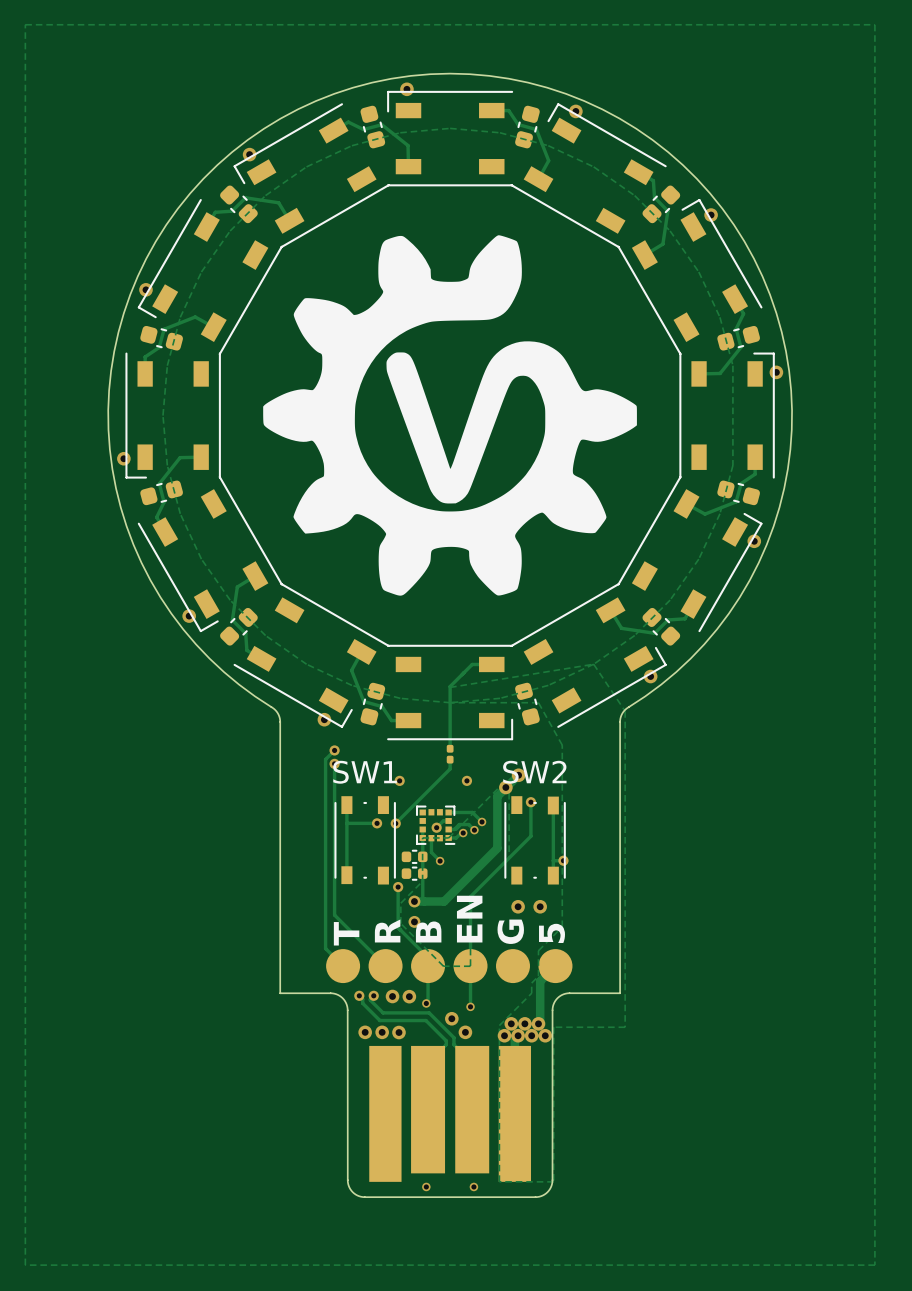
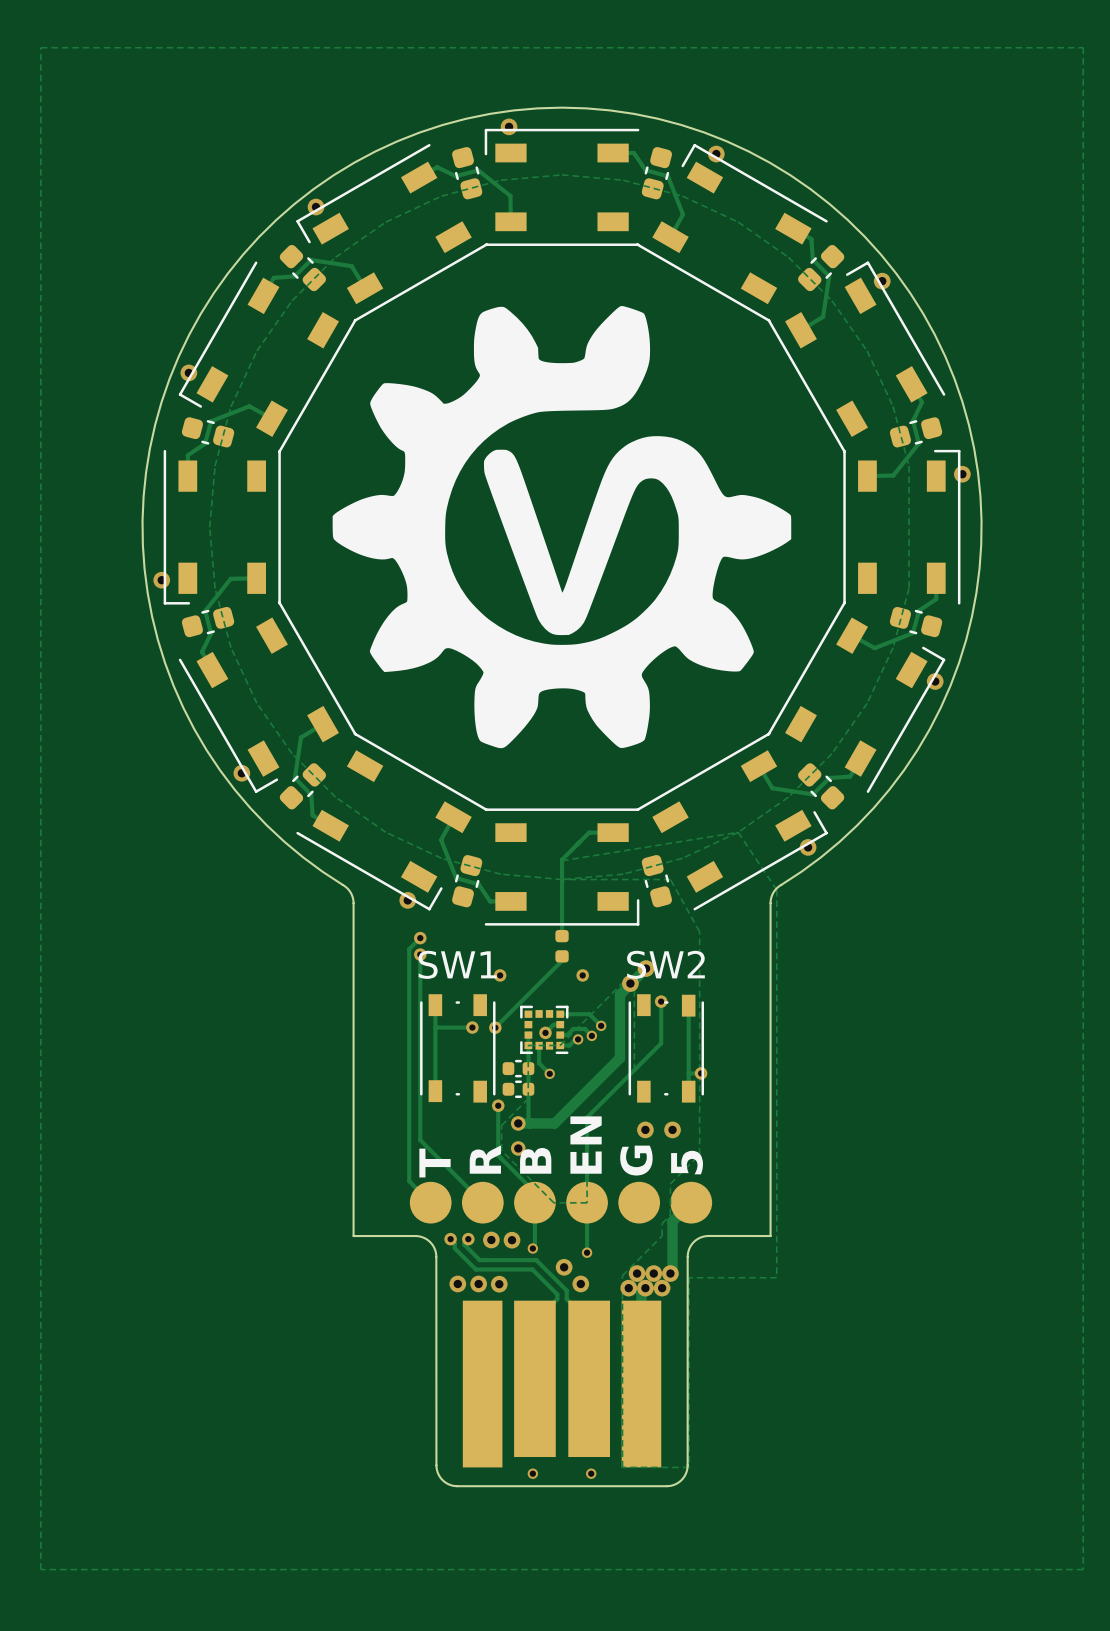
part footprint: [446, 744, 454, 764] -> [555, 929, 569, 963]
via: (545, 1035) -> none

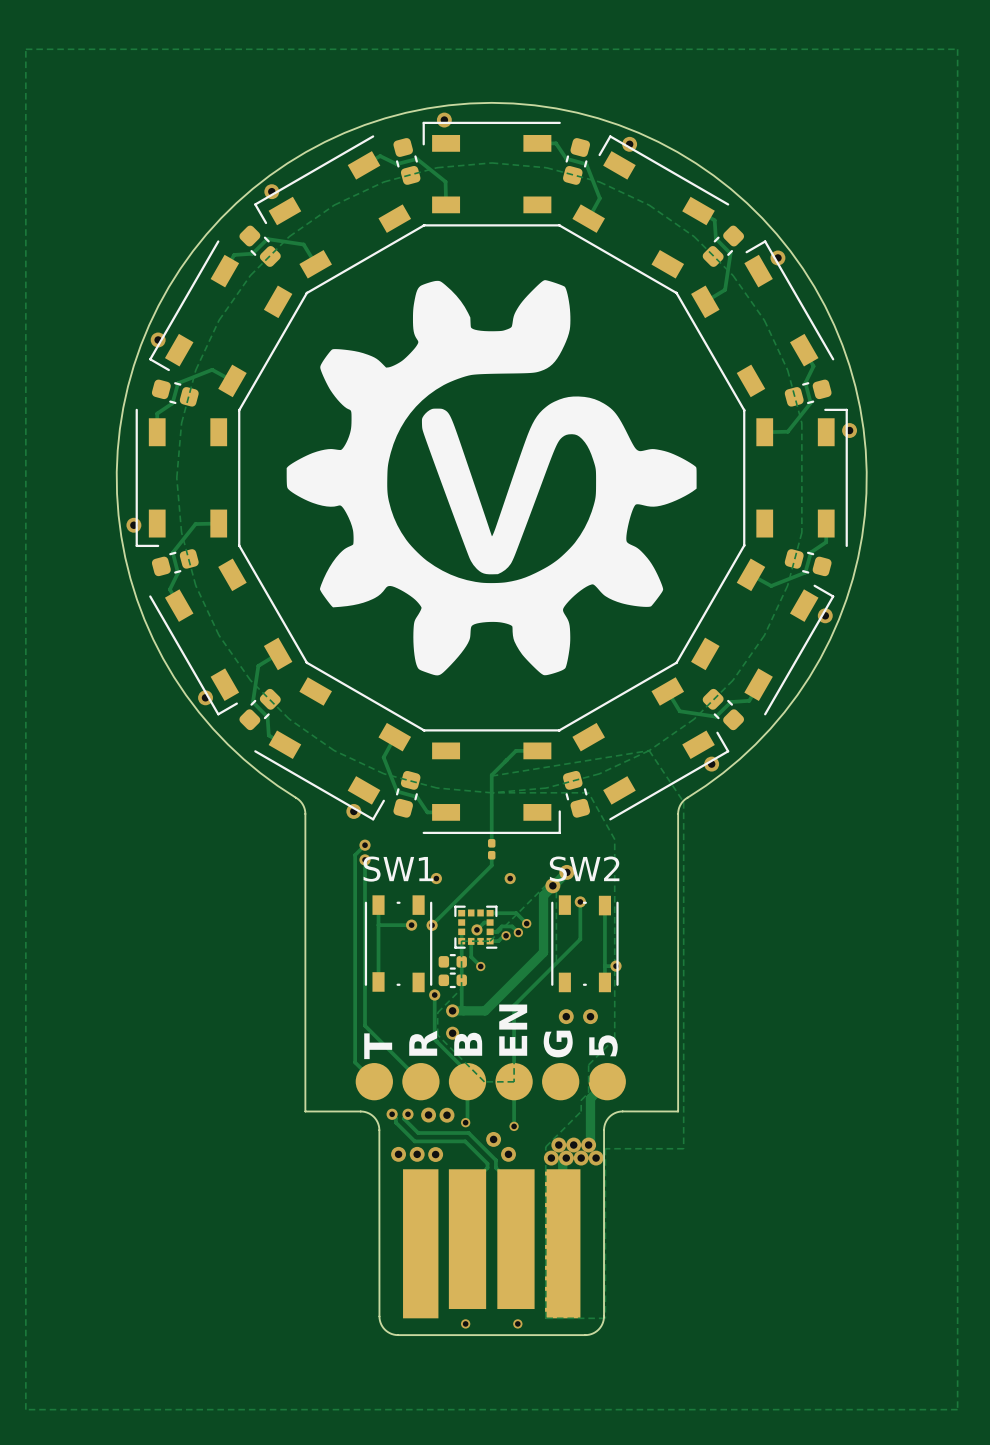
part footprint: [555, 929, 569, 963] -> [488, 839, 496, 860]
via: none -> (596, 1158)

